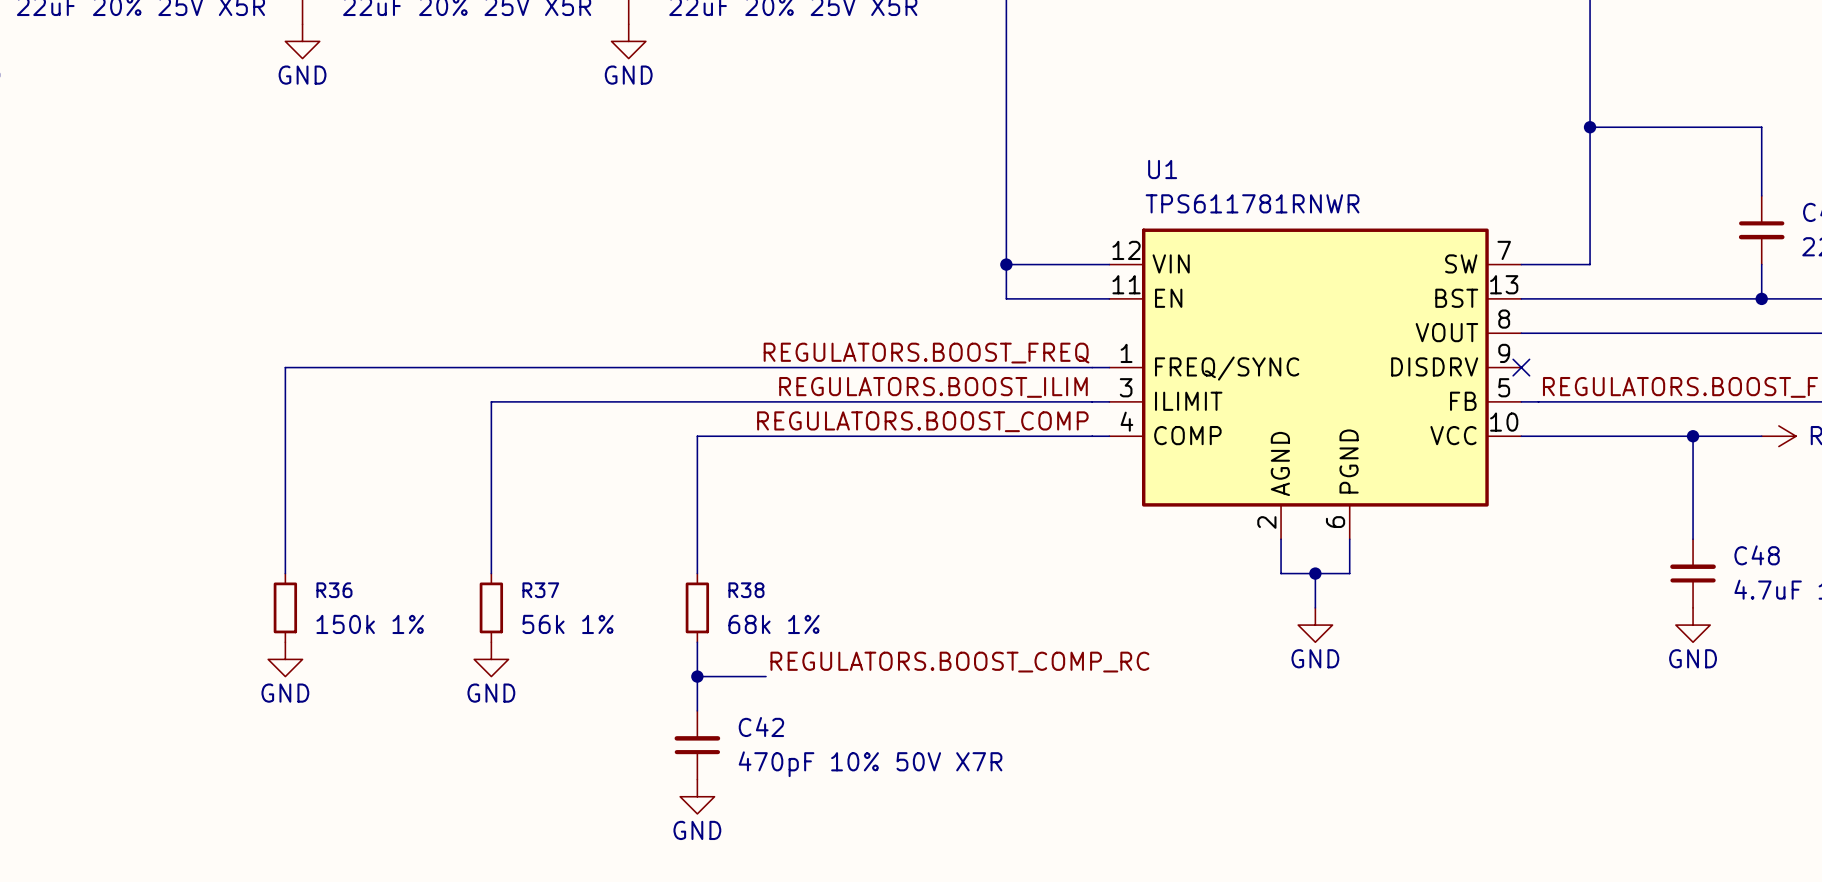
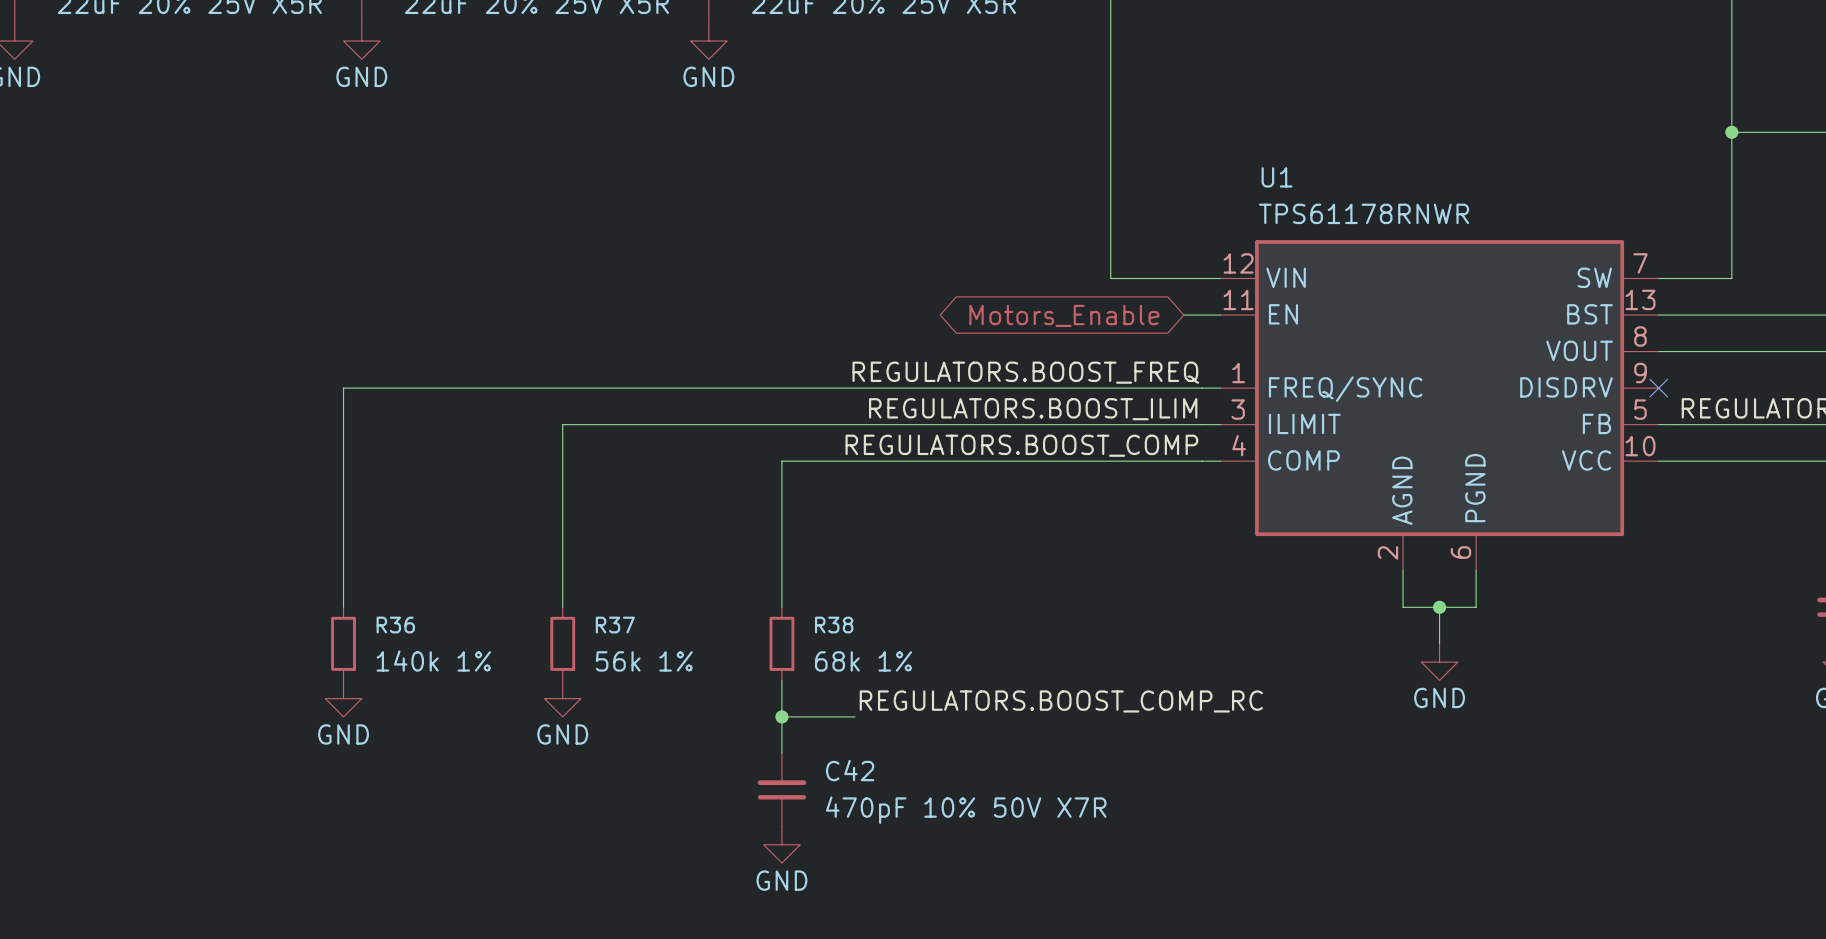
U1 value: TPS611781RNWR (1252, 203) -> TPS61178RNWR (1364, 213)
wire: (1006, 264) (1006, 298) (1075, 298) -> none
junction: (1006, 264) -> none
global label: none -> Motors_Enable (1064, 315)
R36 value: 150k 1% (370, 624) -> 140k 1% (433, 660)

